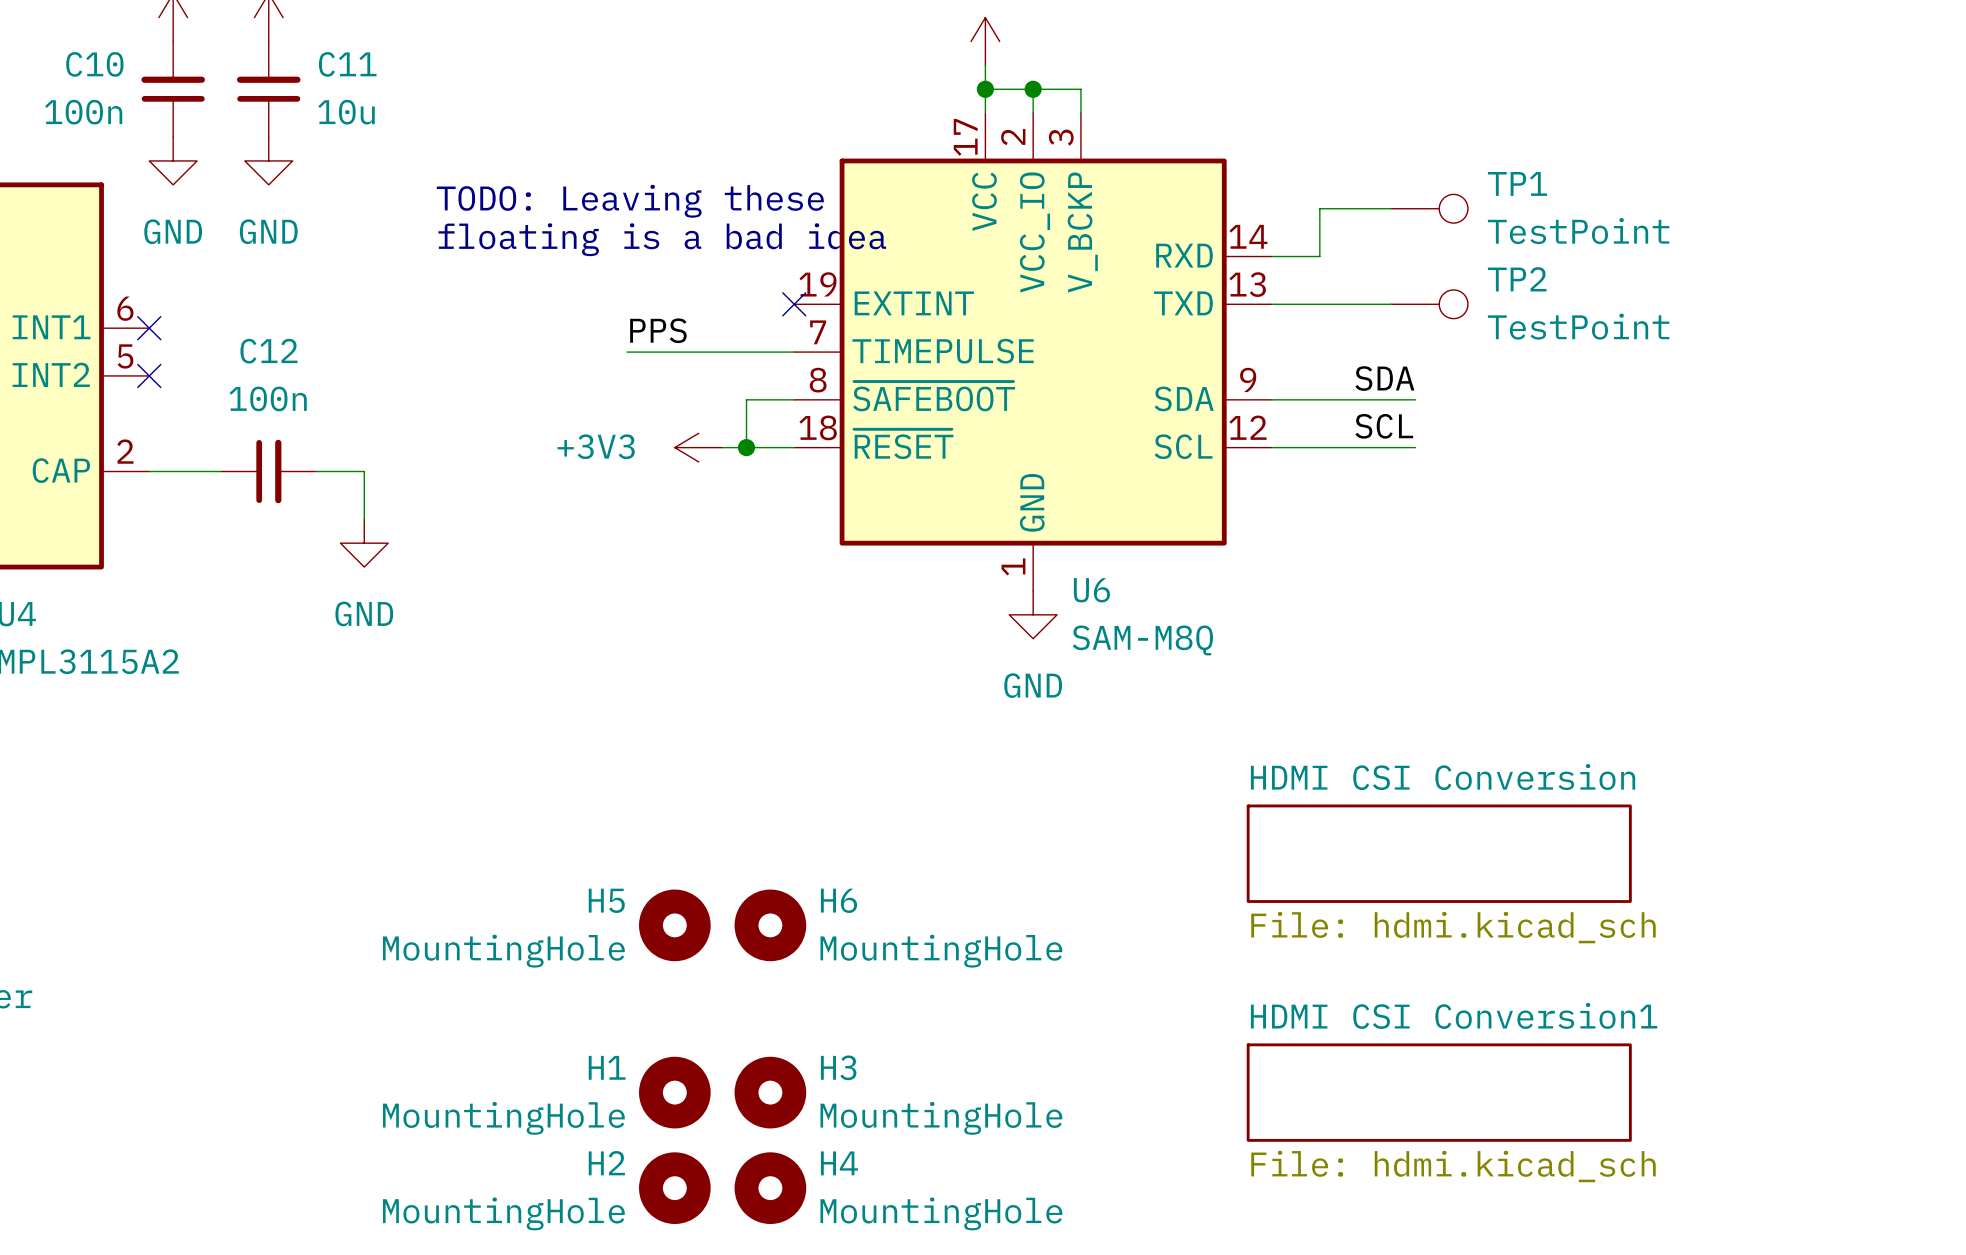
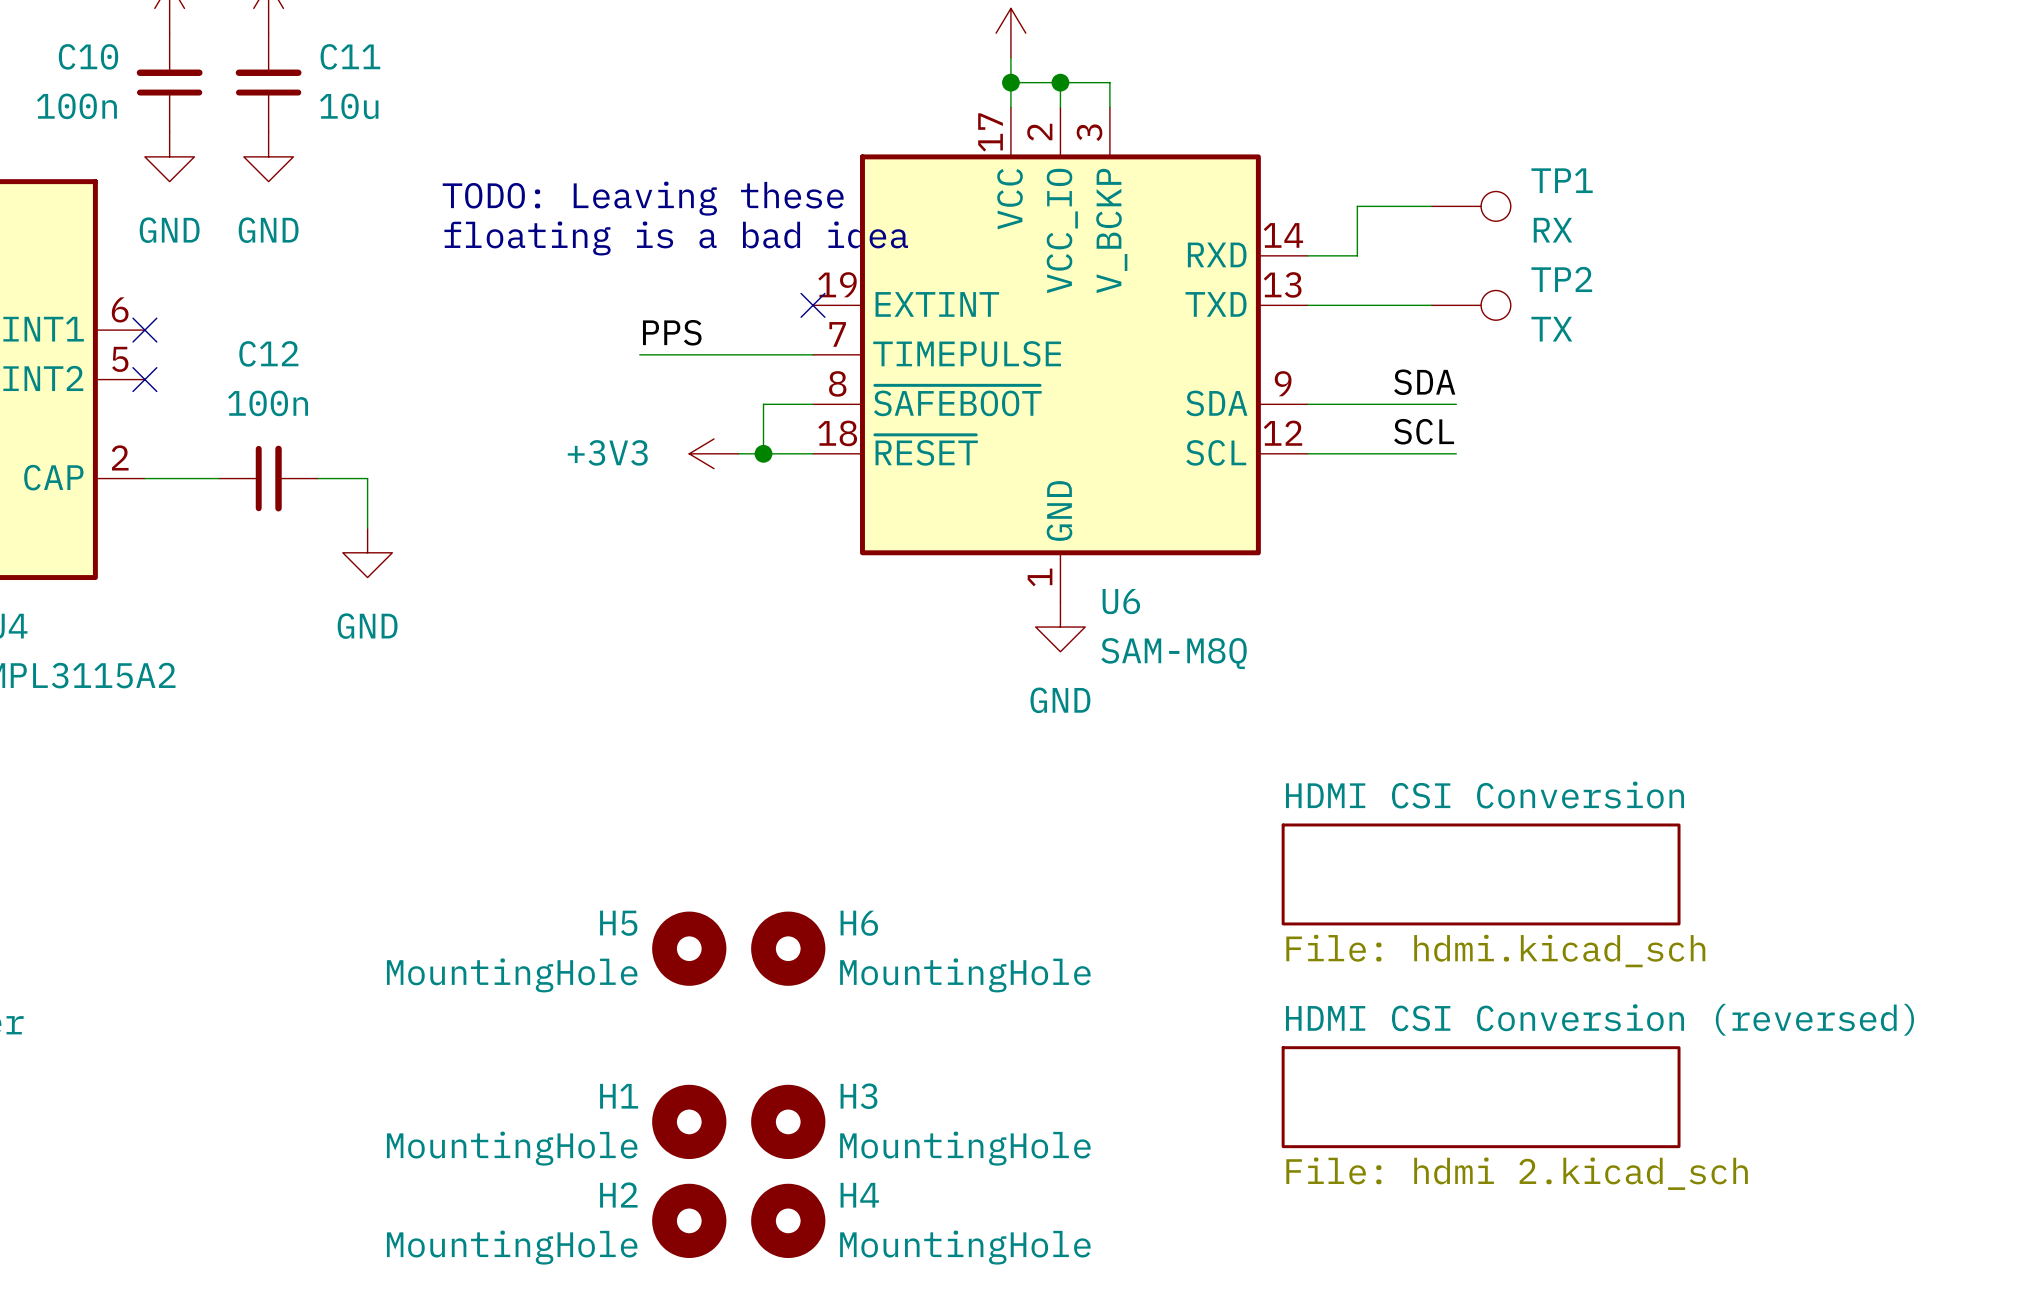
TP1 value: TestPoint (1578, 231) -> RX (1553, 230)
TP2 value: TestPoint (1578, 326) -> TX (1551, 329)
sheet HDMI CSI Conversion (reversed): none -> File: hdmi 2.kicad_sch (1481, 1097)
sheet HDMI CSI Conversion1: File: hdmi.kicad_sch (1439, 1092) -> none

